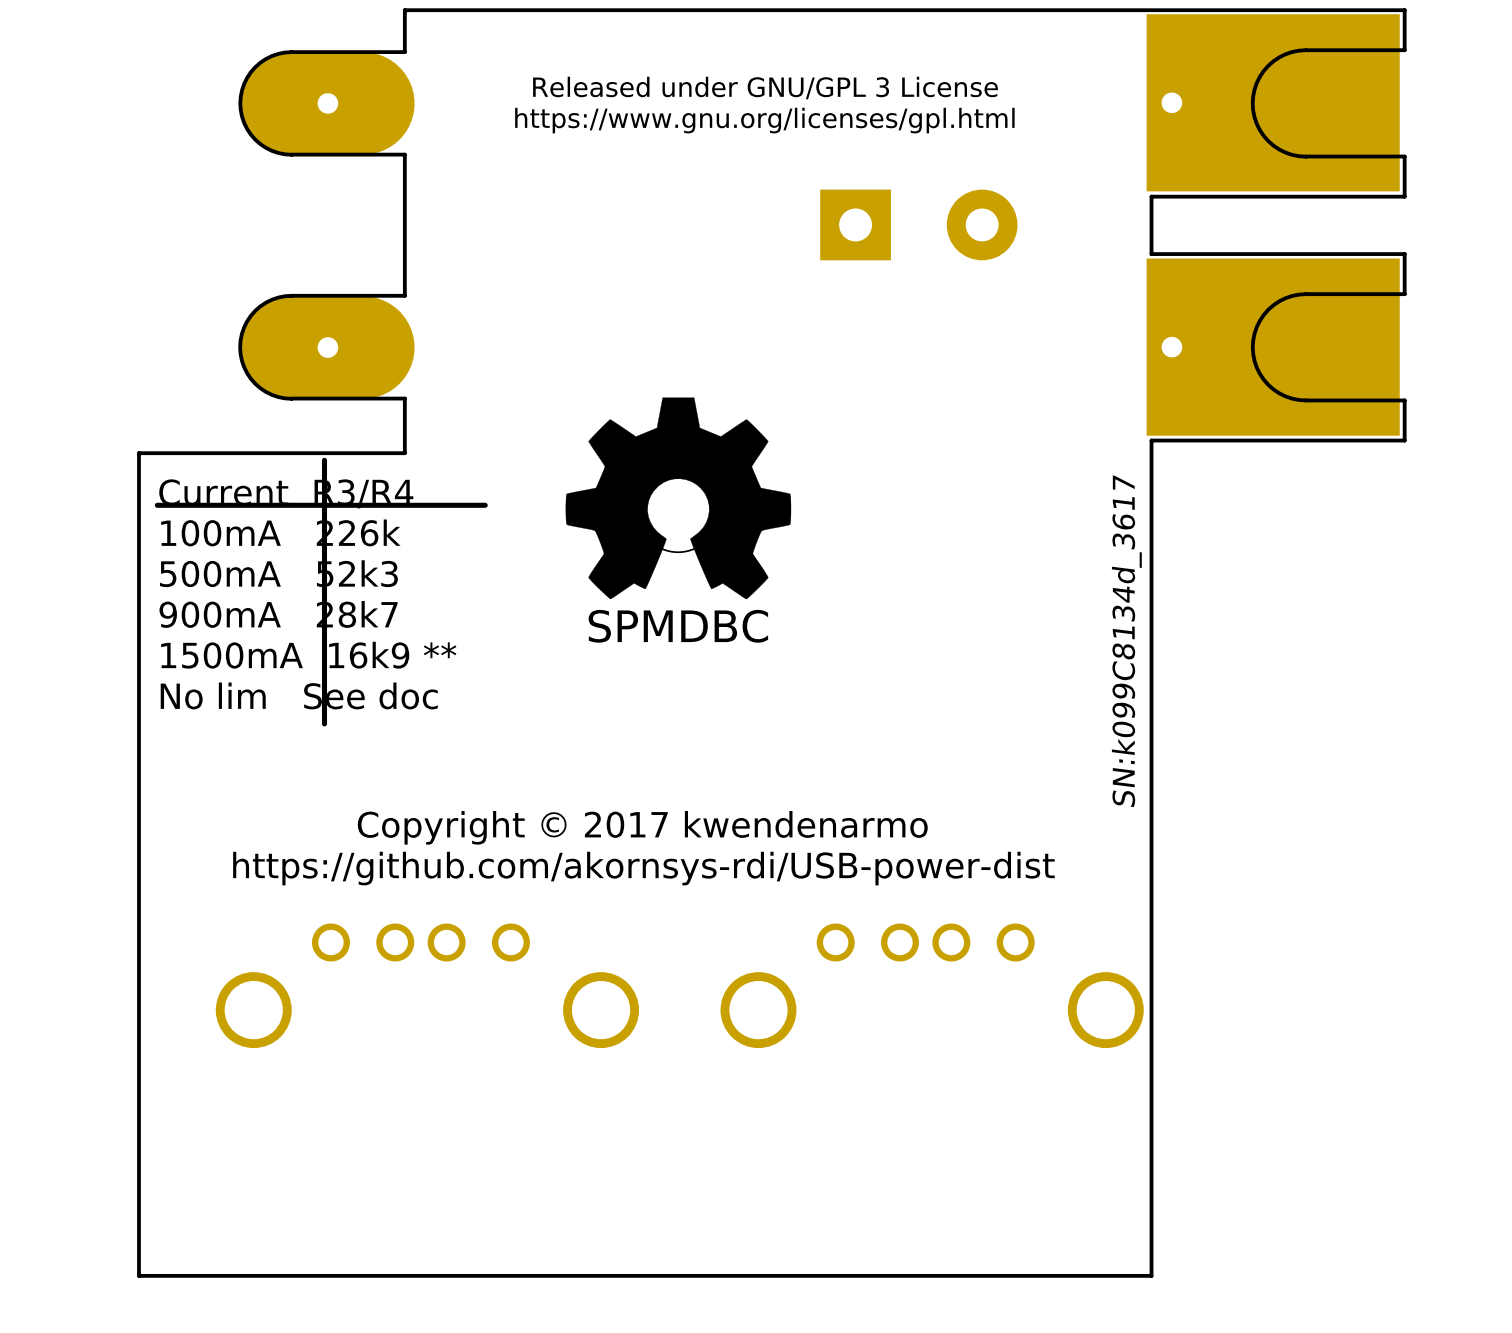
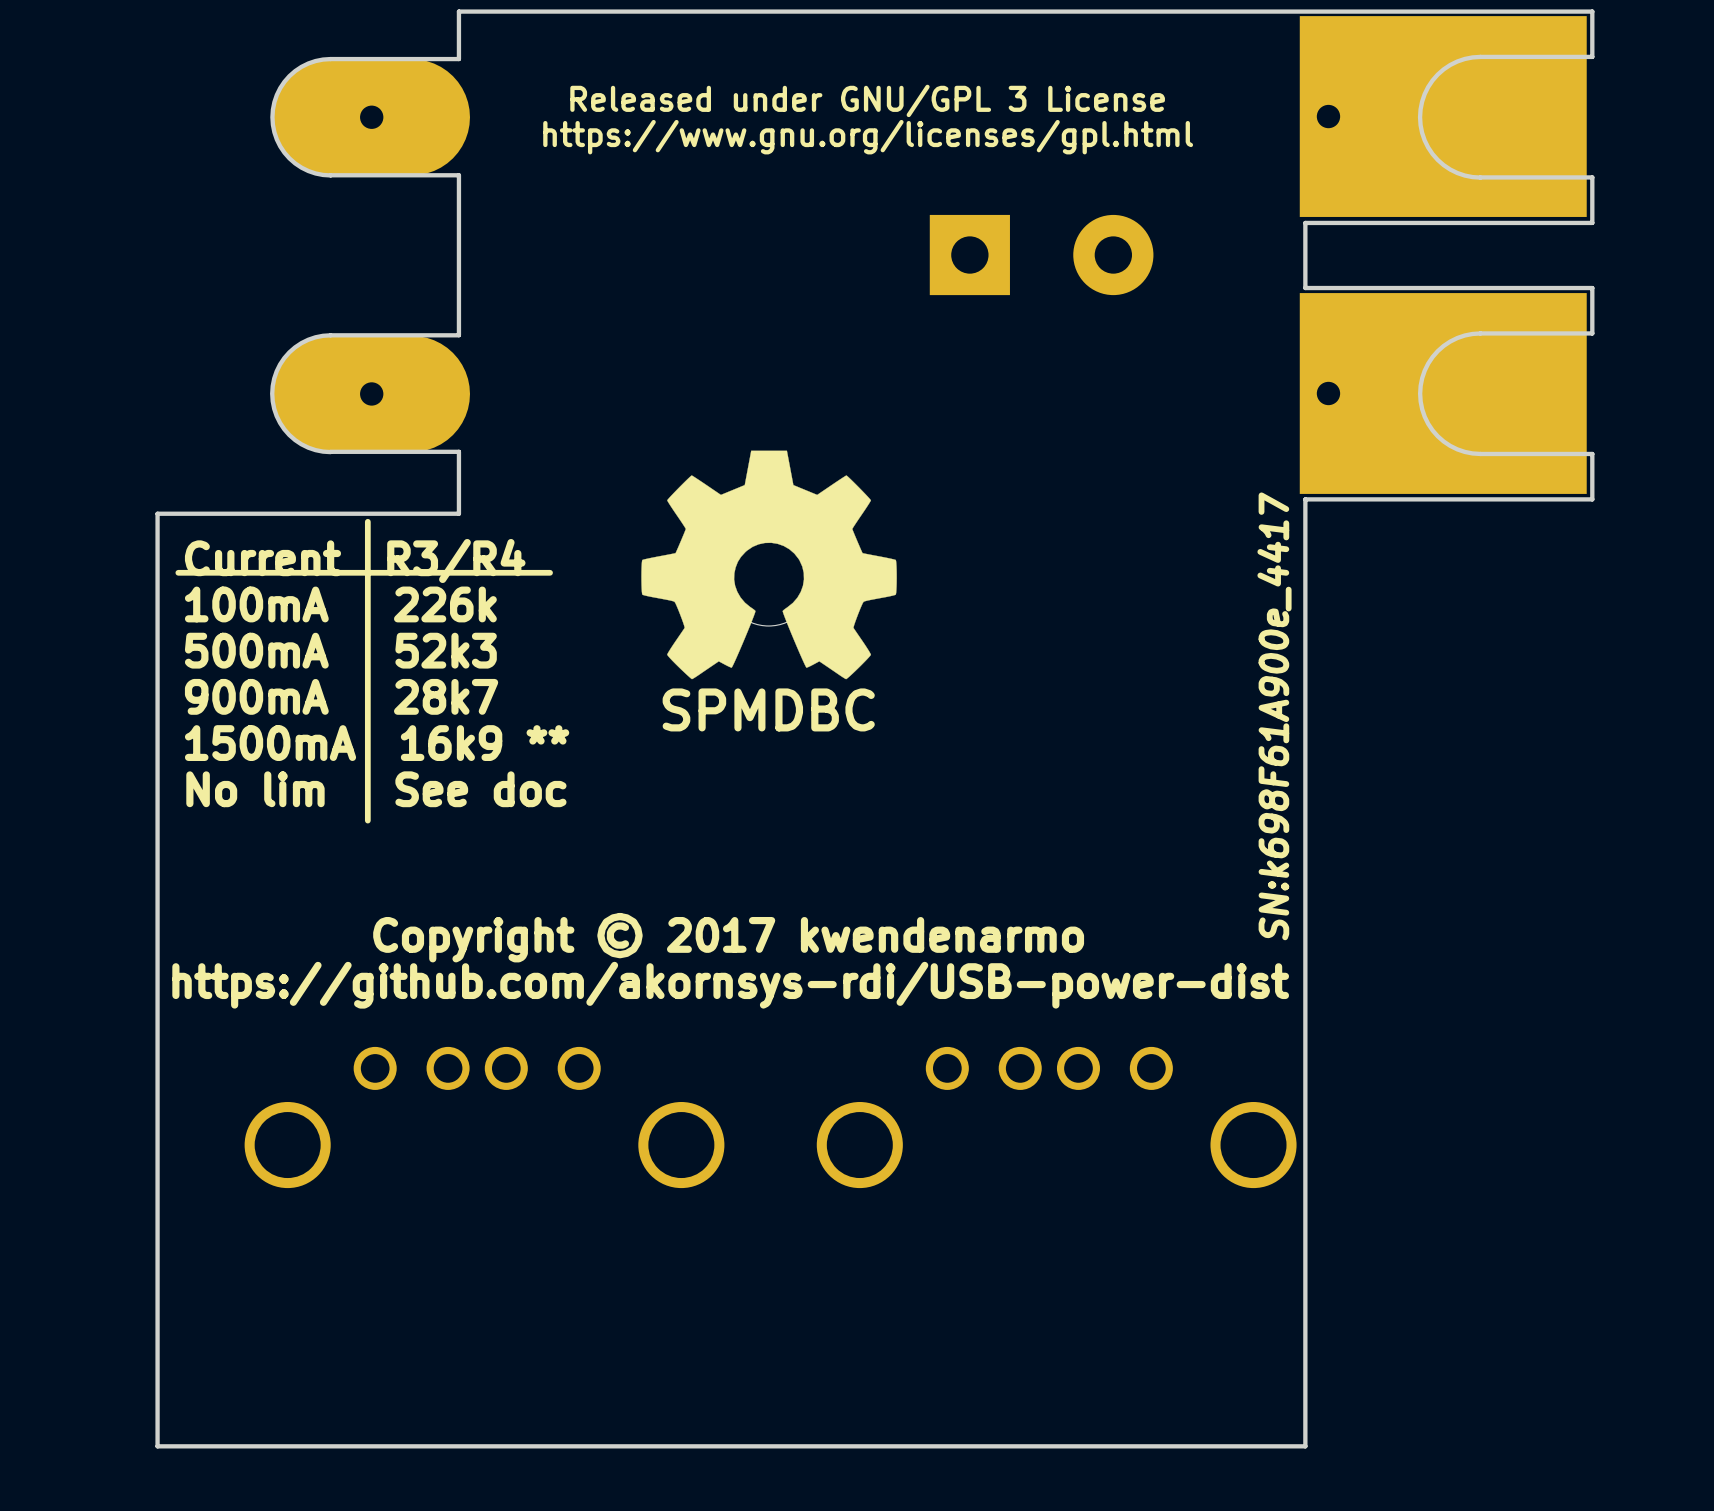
text: SN:k099C8134d_3617 (1126, 641) -> SN:k698F61A900e_4417 (1274, 716)

